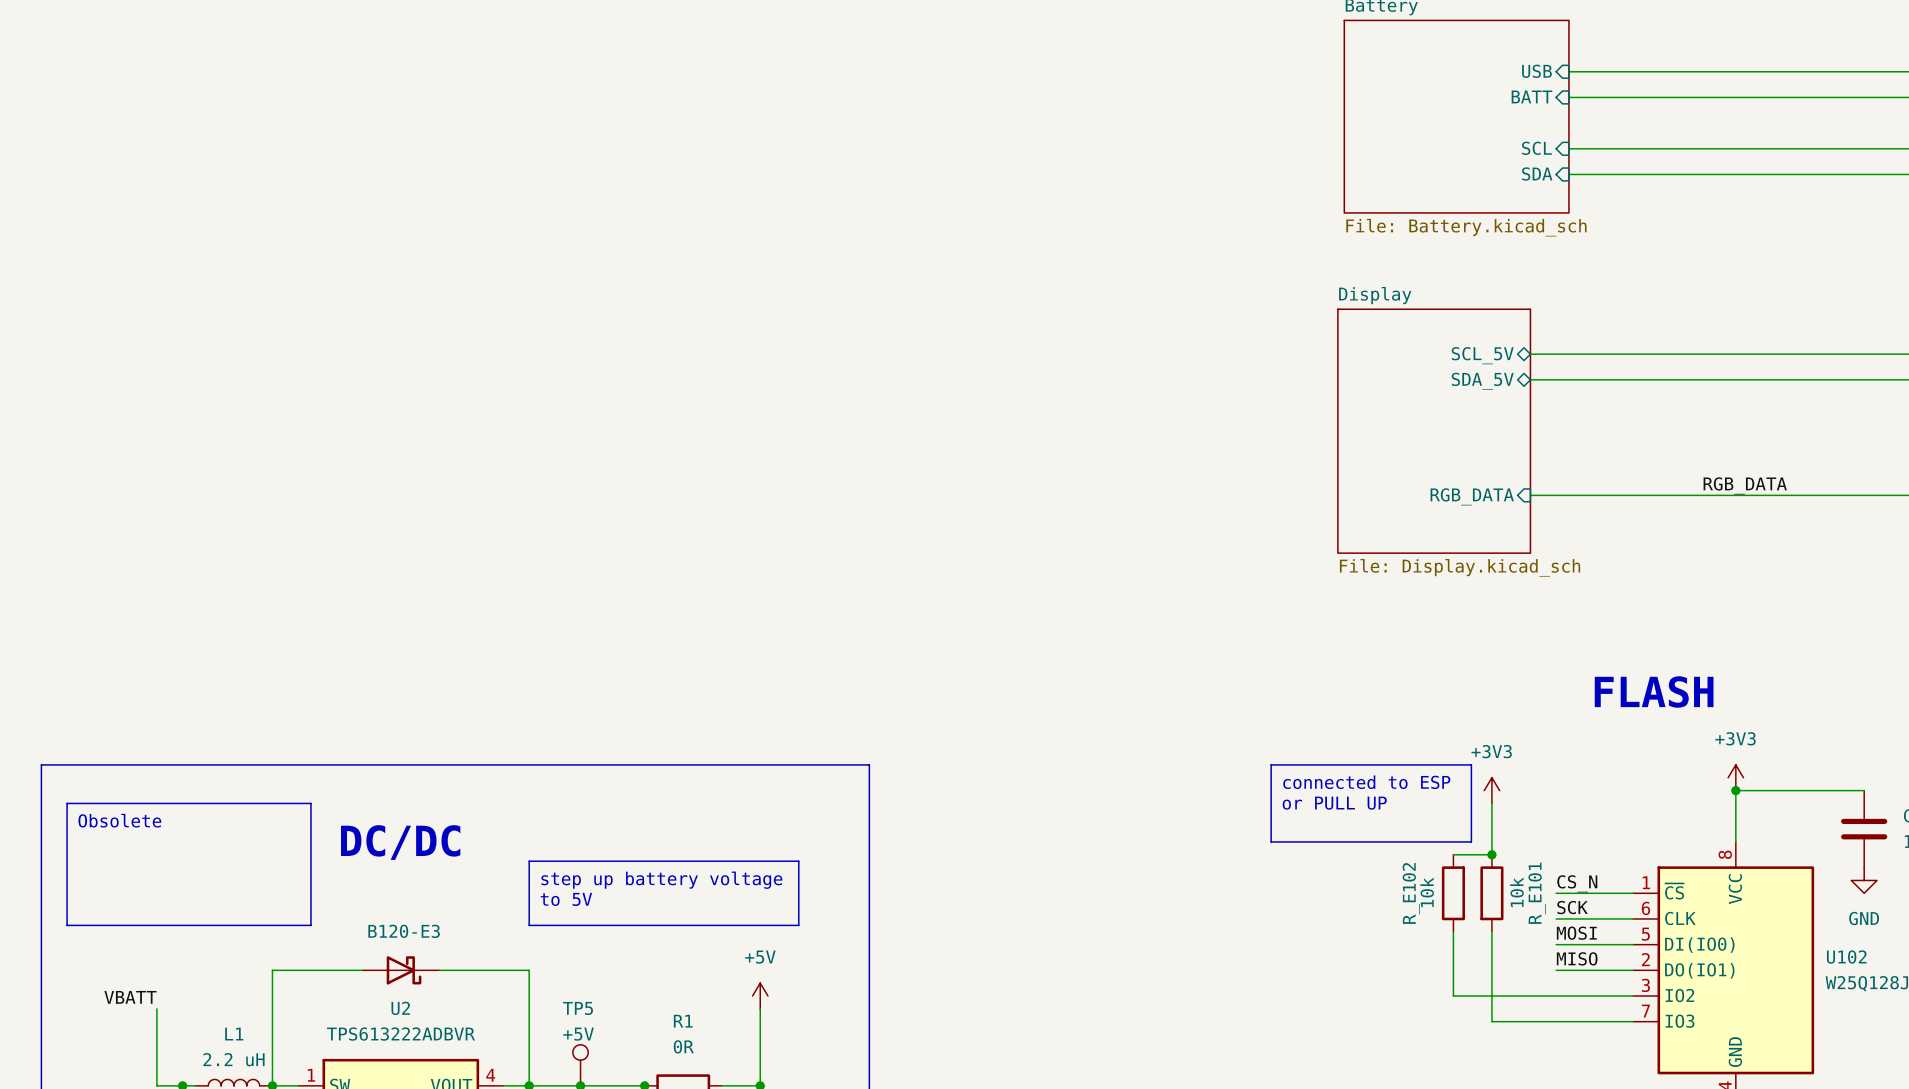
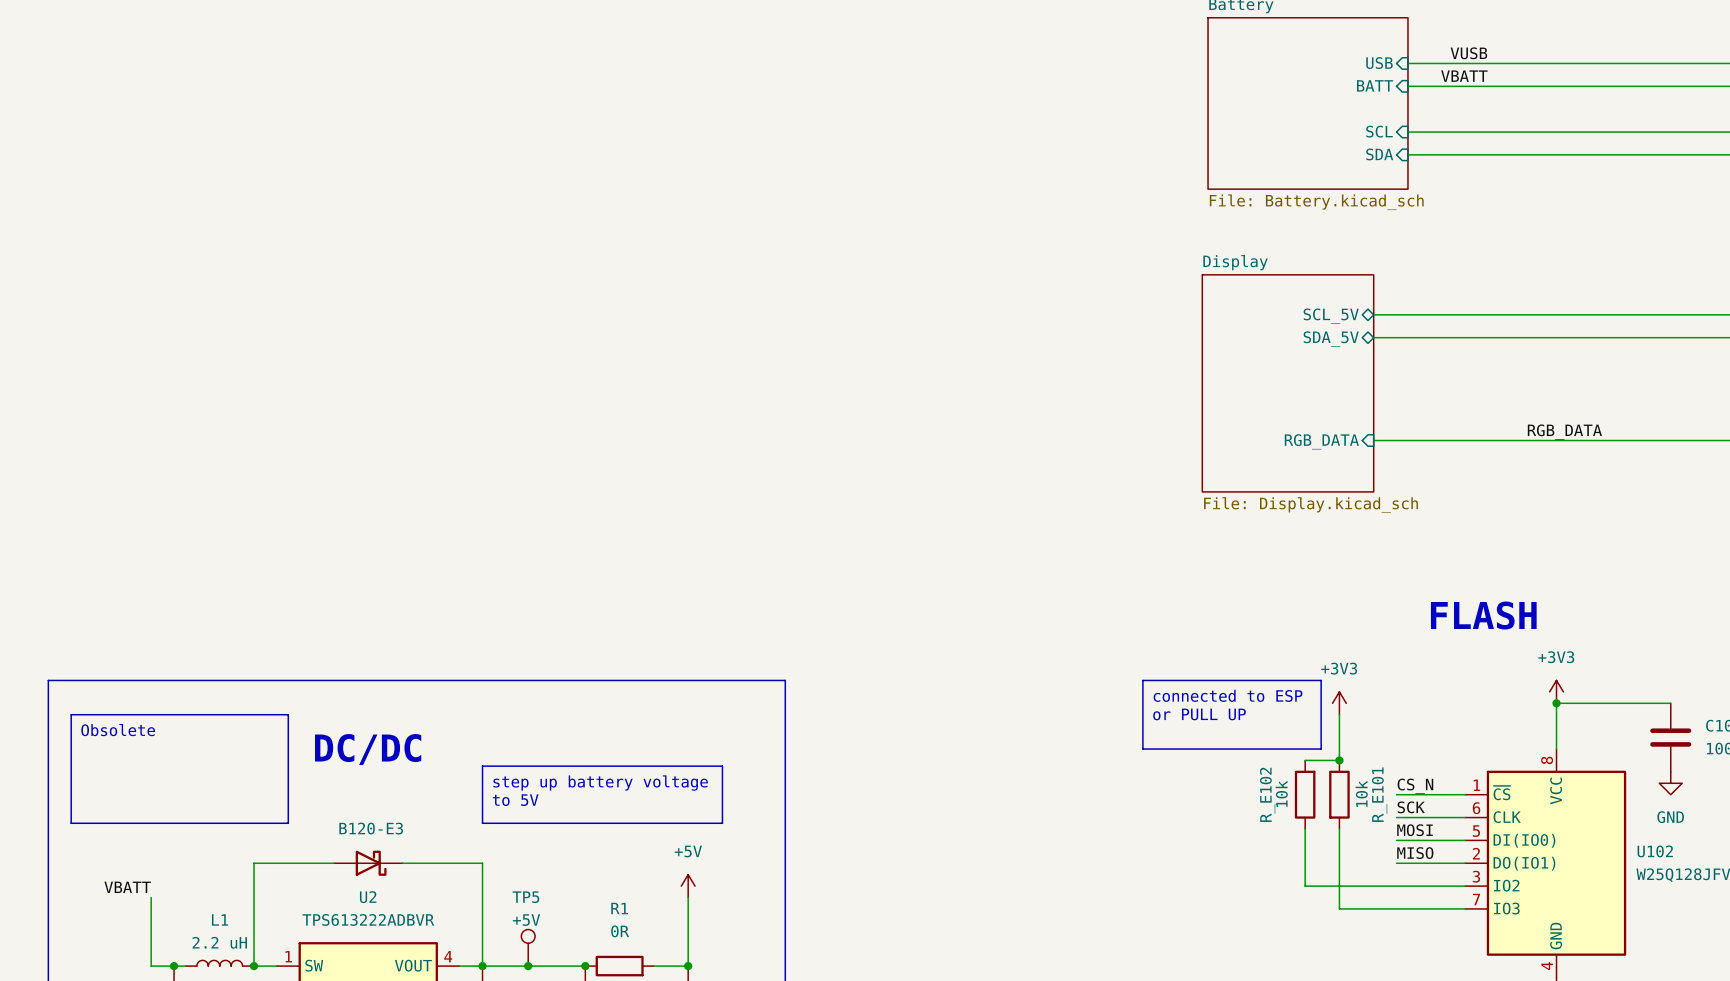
label: none -> VUSB (1468, 53)
label: none -> VBATT (1464, 76)

